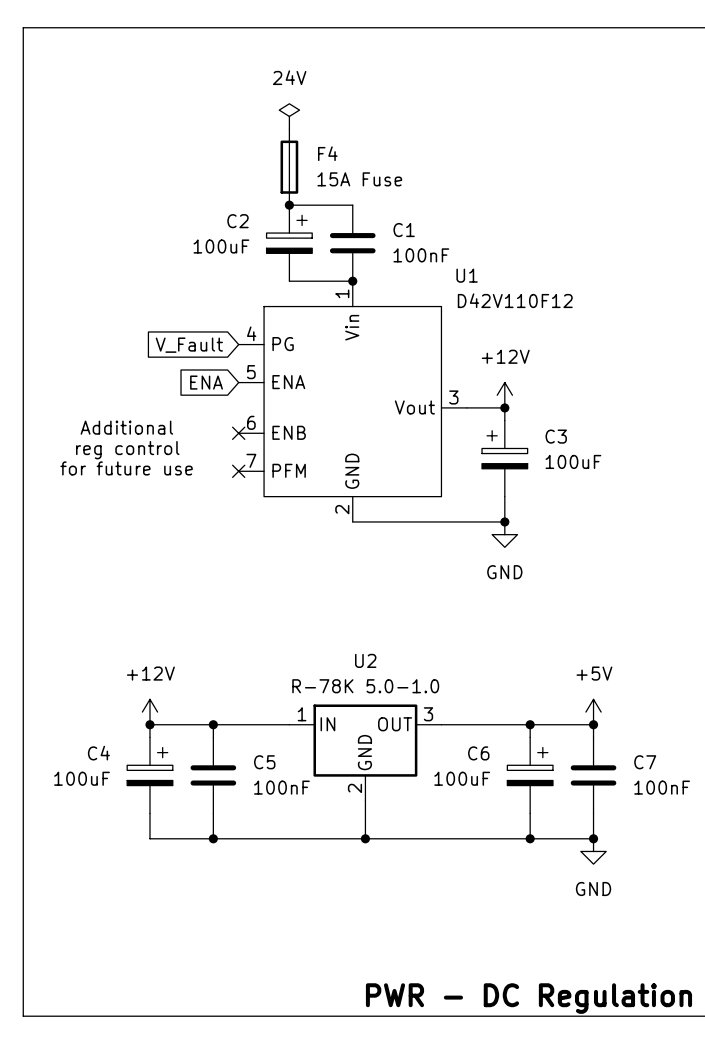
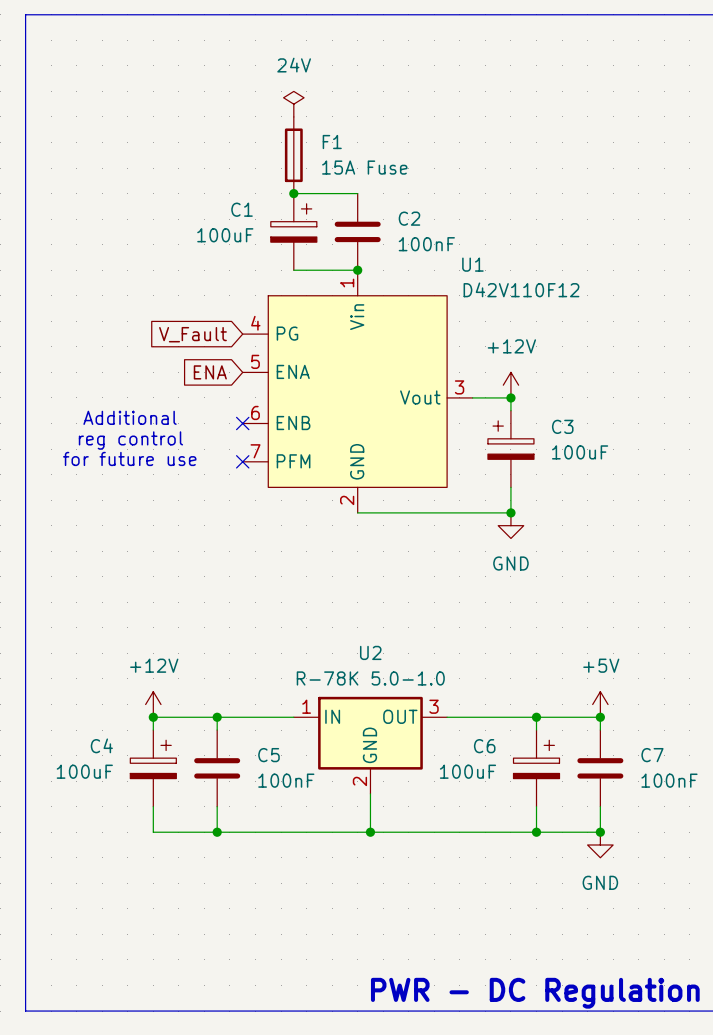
F4 name: F4 (327, 153) -> F1 (332, 142)
C2 name: C2 (238, 221) -> C1 (242, 209)
C1 name: C1 (404, 230) -> C2 (409, 218)

